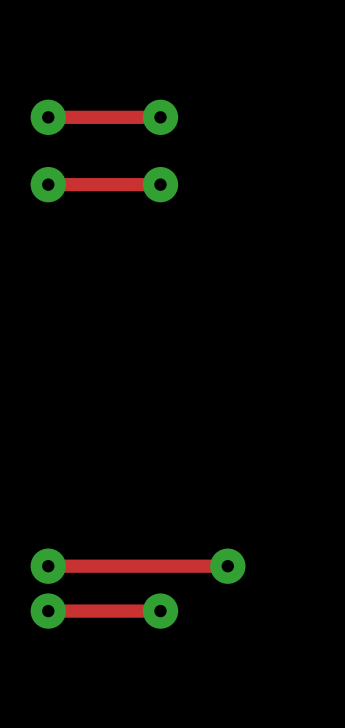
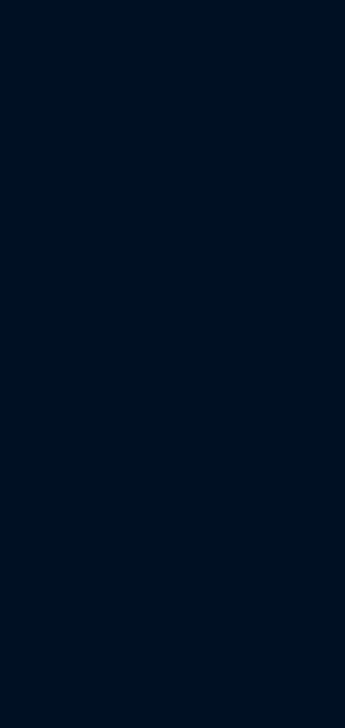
track: (48, 117) (160, 117) -> none
via: (48, 117) -> none
via: (160, 117) -> none
track: (48, 184) (160, 184) -> none
via: (48, 184) -> none
via: (160, 184) -> none
track: (48, 566) (227, 566) -> none
via: (48, 566) -> none
via: (227, 566) -> none
track: (48, 611) (160, 611) -> none
via: (48, 611) -> none
via: (160, 611) -> none

